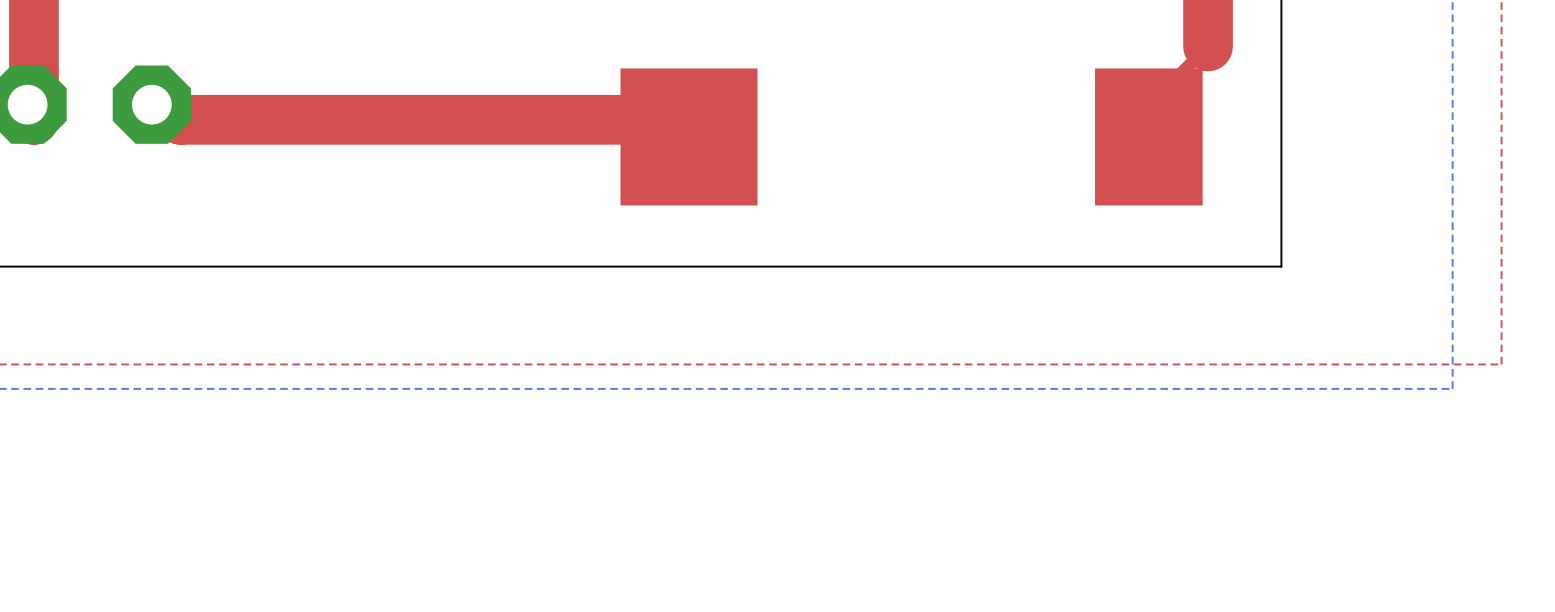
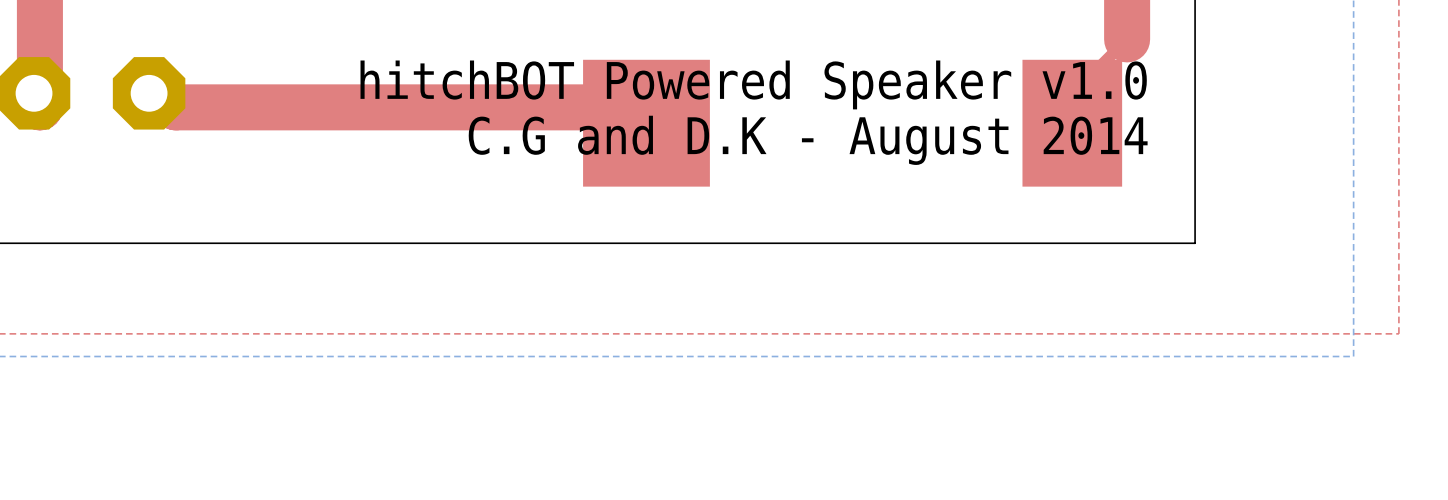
text: none -> hitchBOT Powered Speaker v1.0 (753, 84)
text: none -> C.G and D.K - August 2014 (808, 140)

